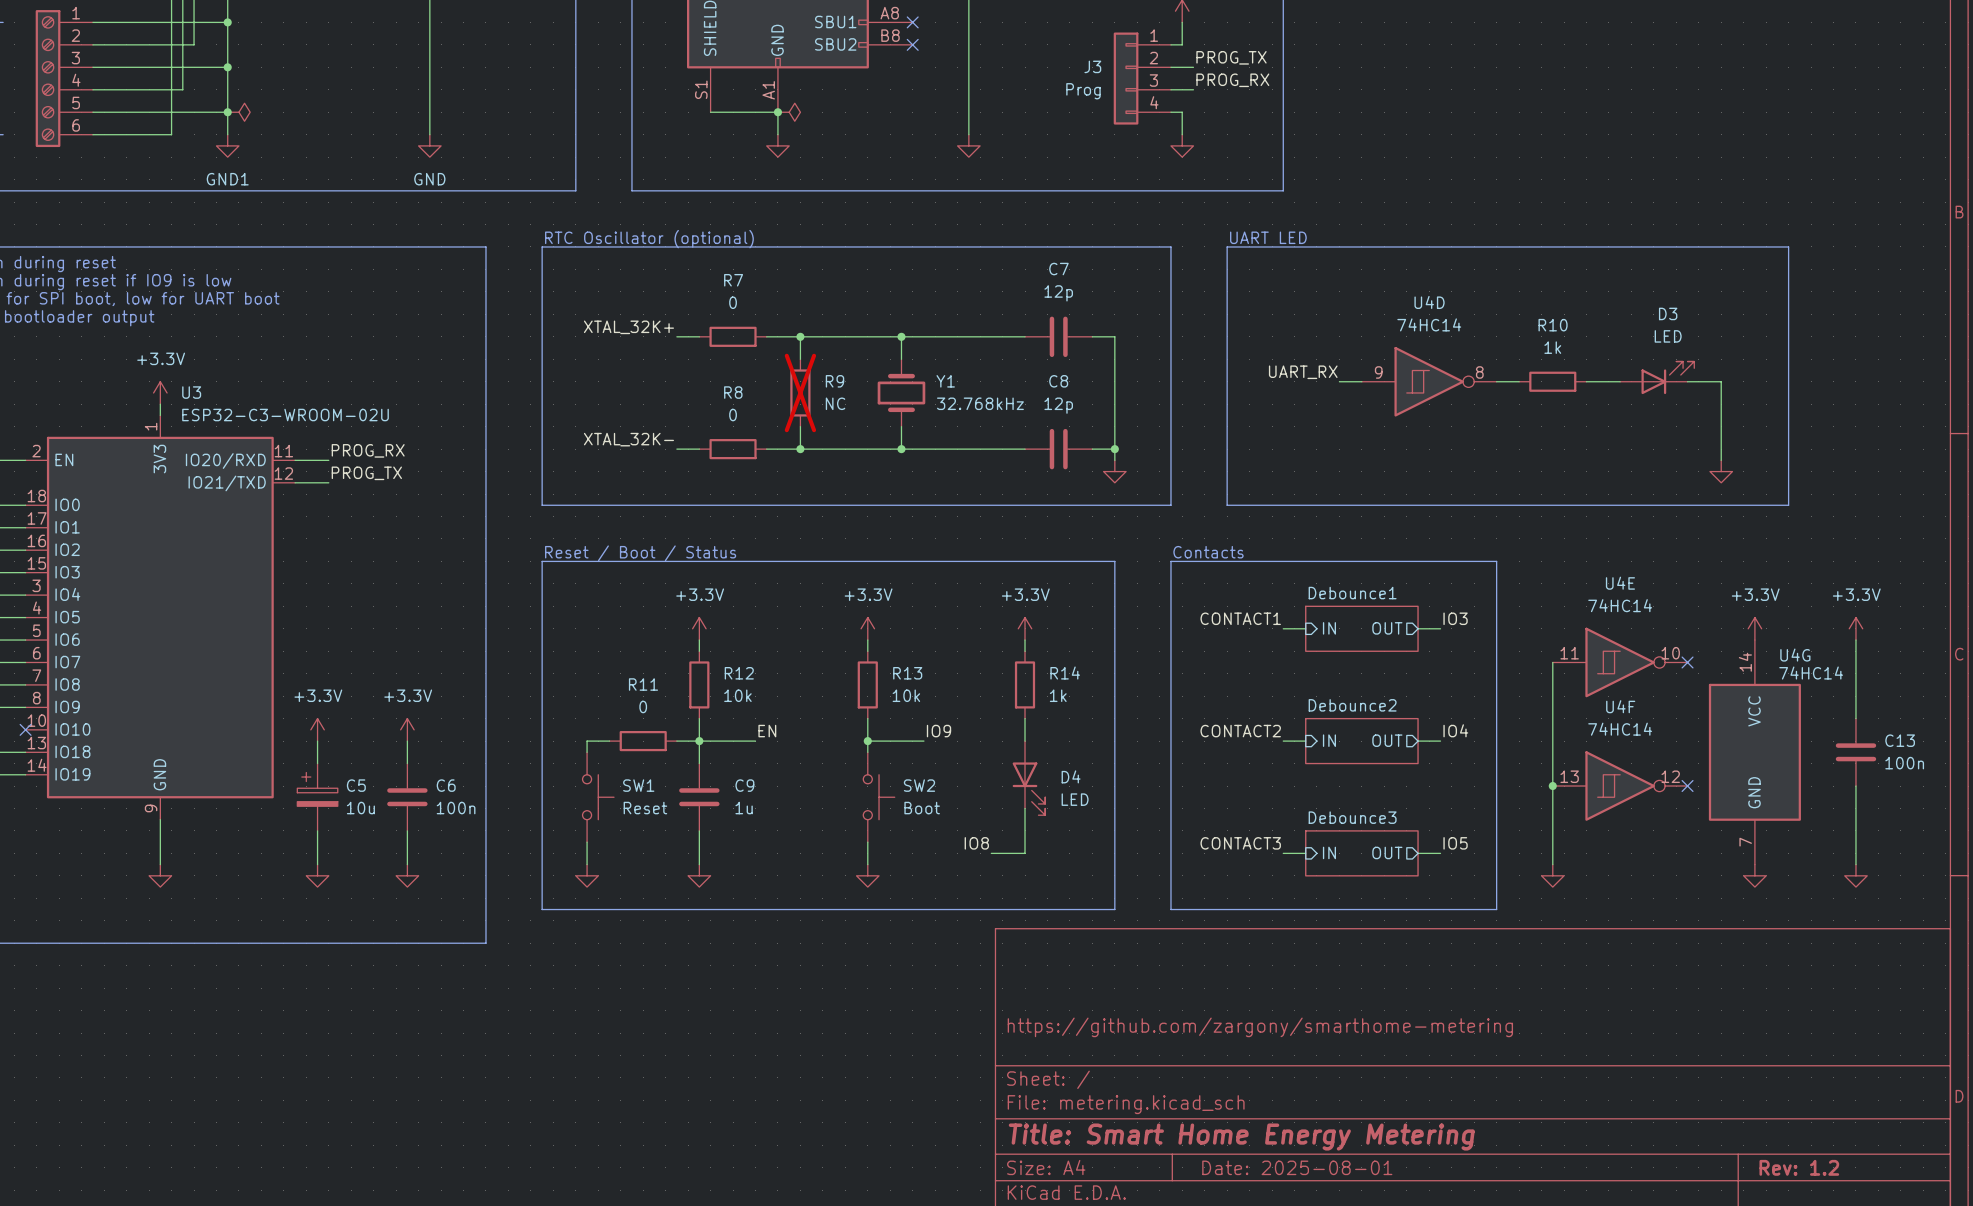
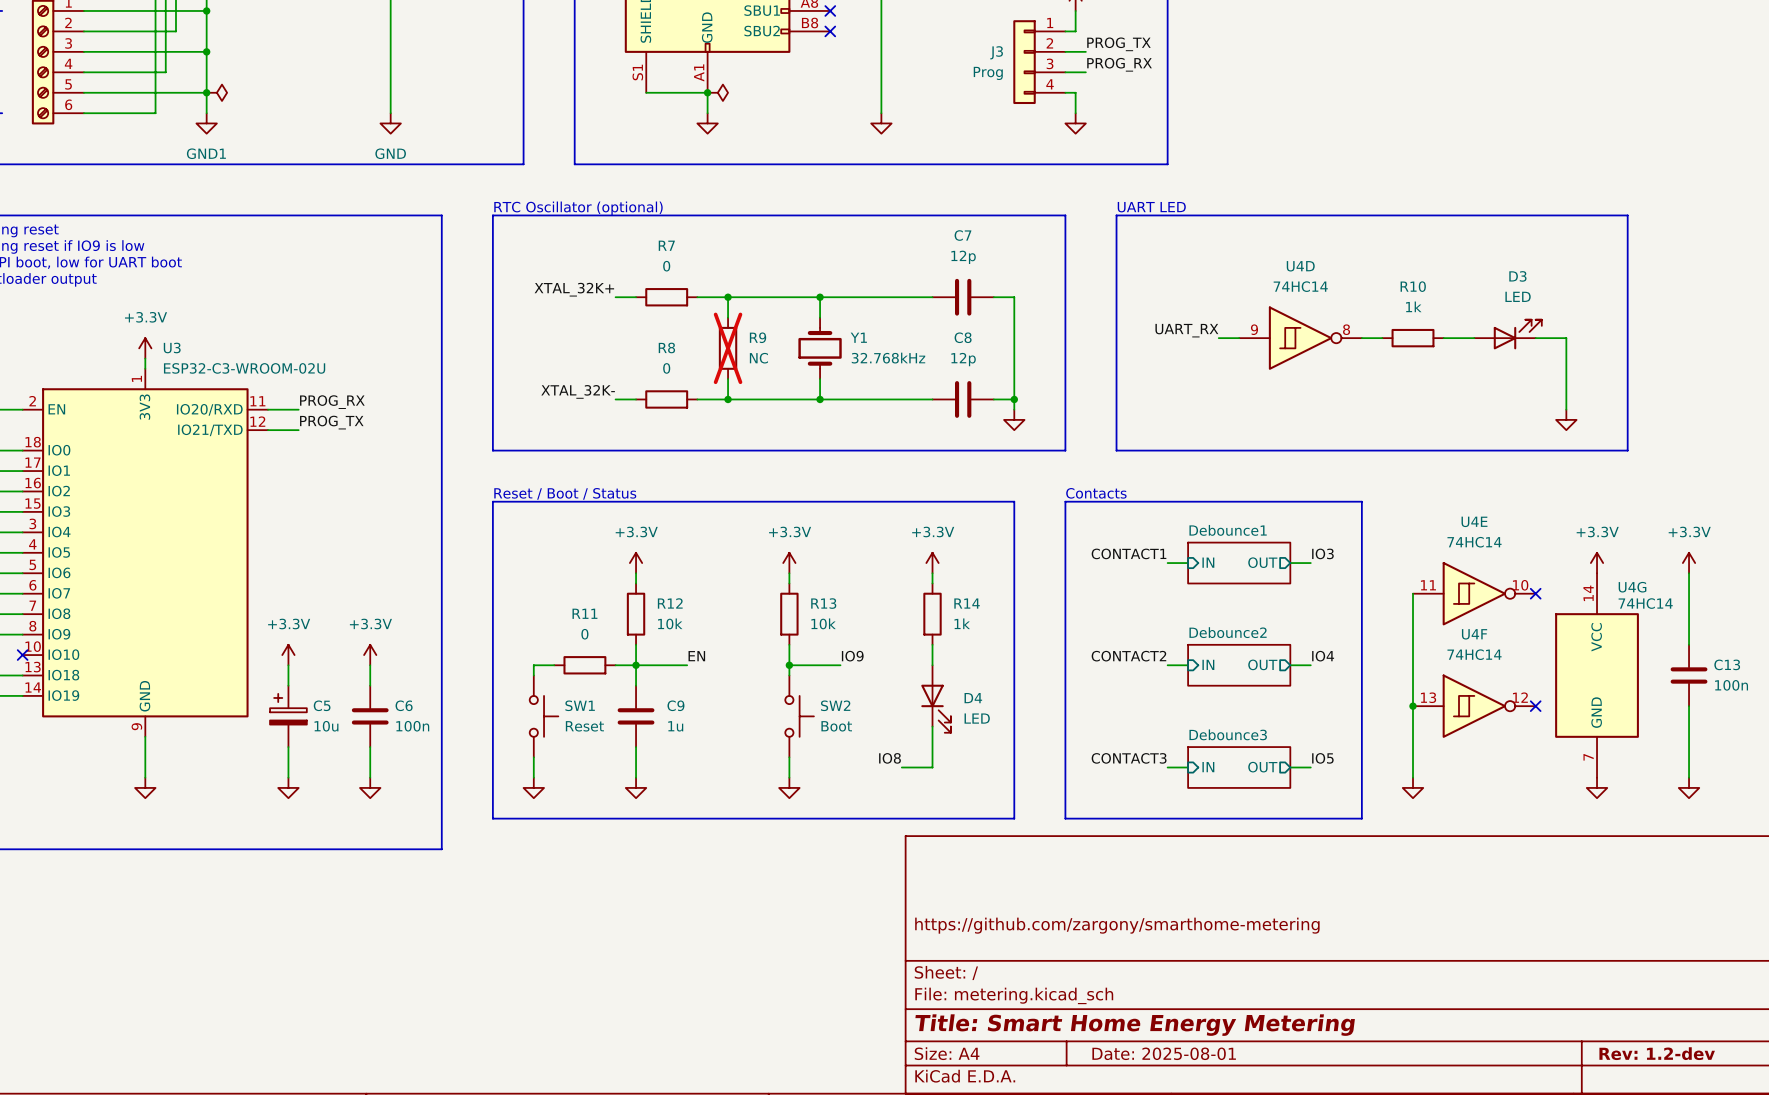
title block: Rev: 1.2 (1799, 1167) -> Rev: 1.2-dev (1657, 1053)

